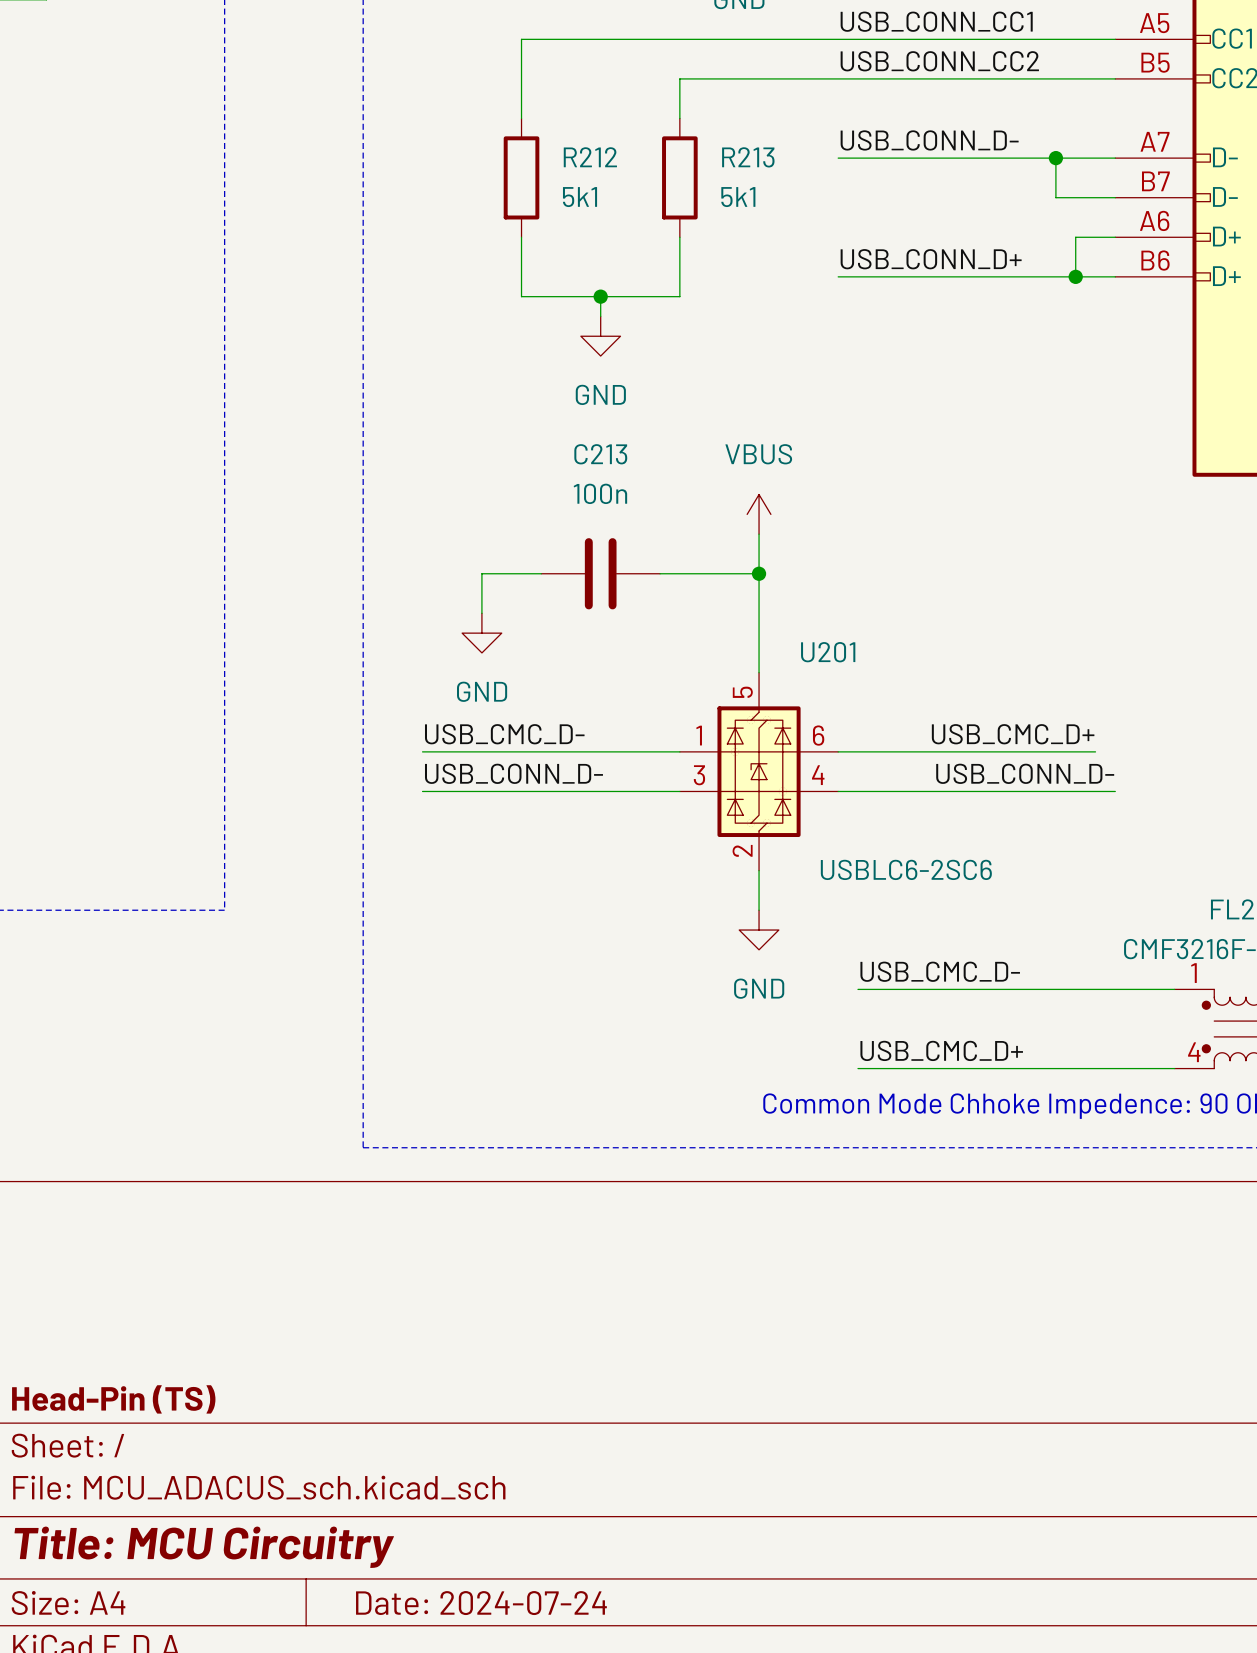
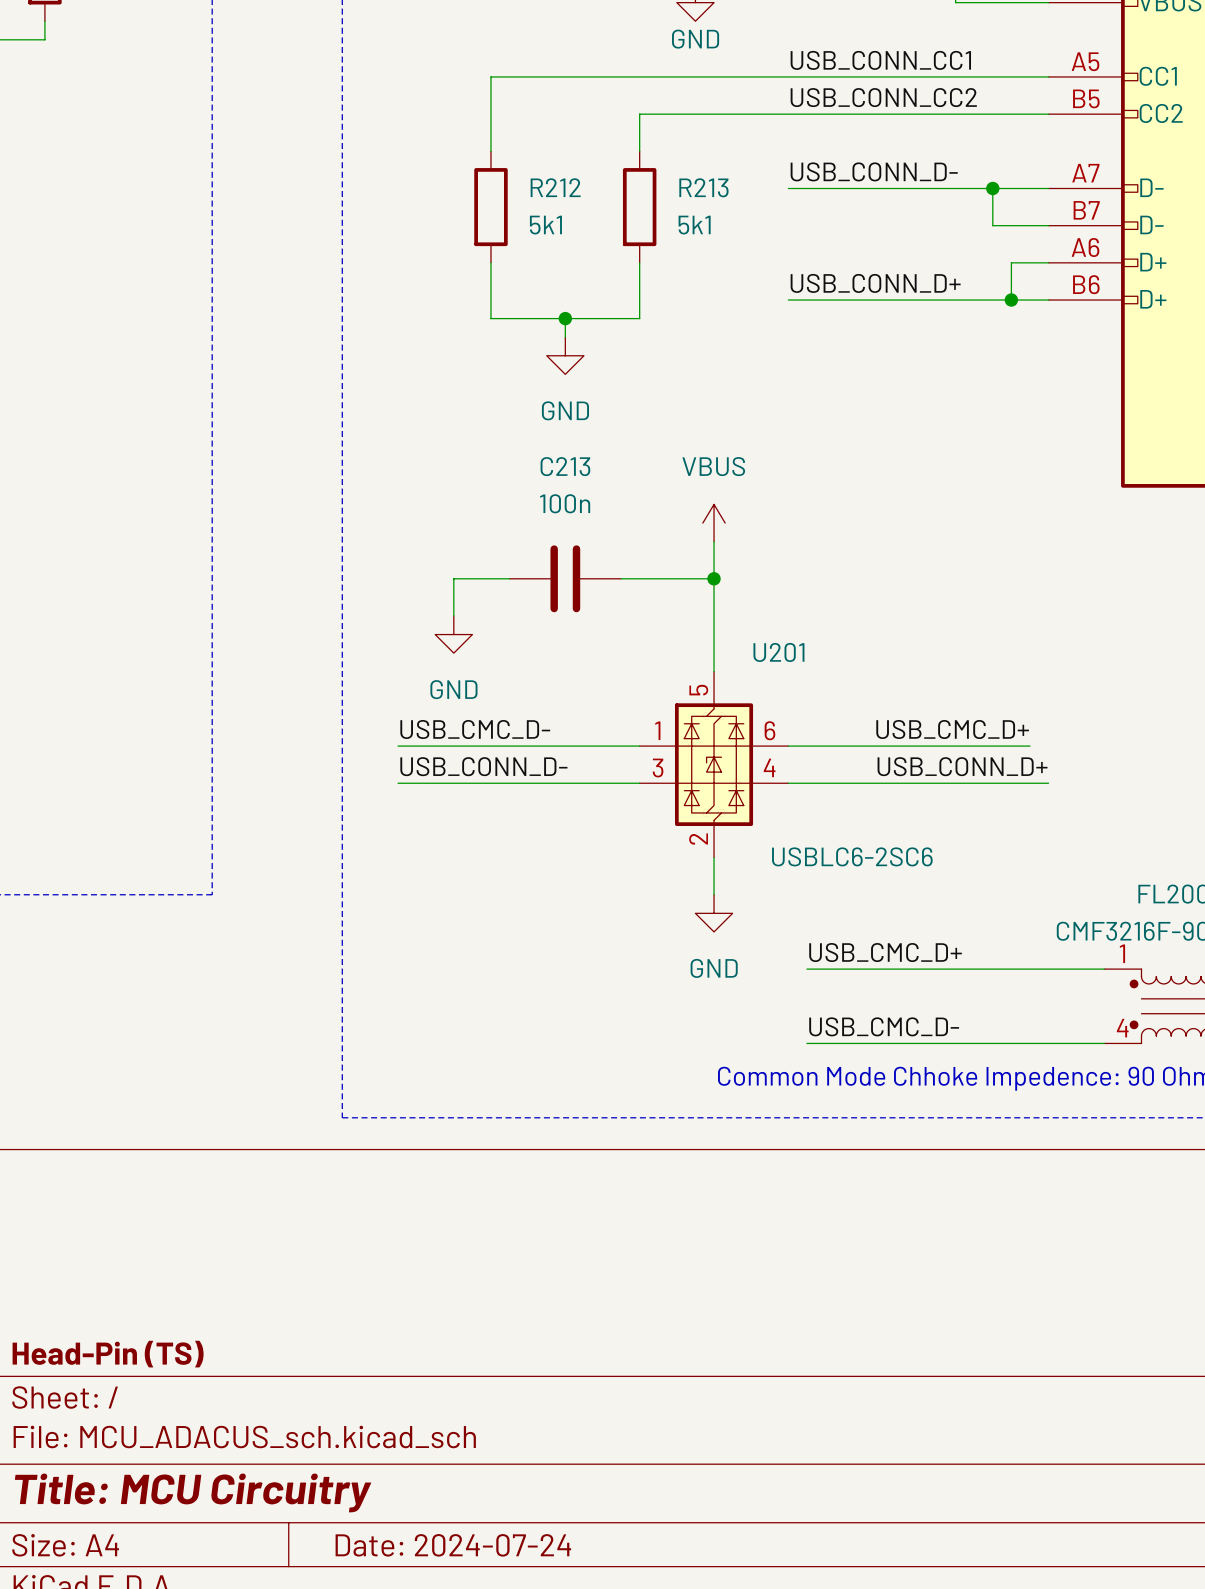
label: USB_CONN_D- (1025, 773) -> USB_CONN_D+ (962, 766)
label: USB_CMC_D- (940, 971) -> USB_CMC_D+ (885, 952)
label: USB_CMC_D+ (941, 1050) -> USB_CMC_D- (884, 1026)

